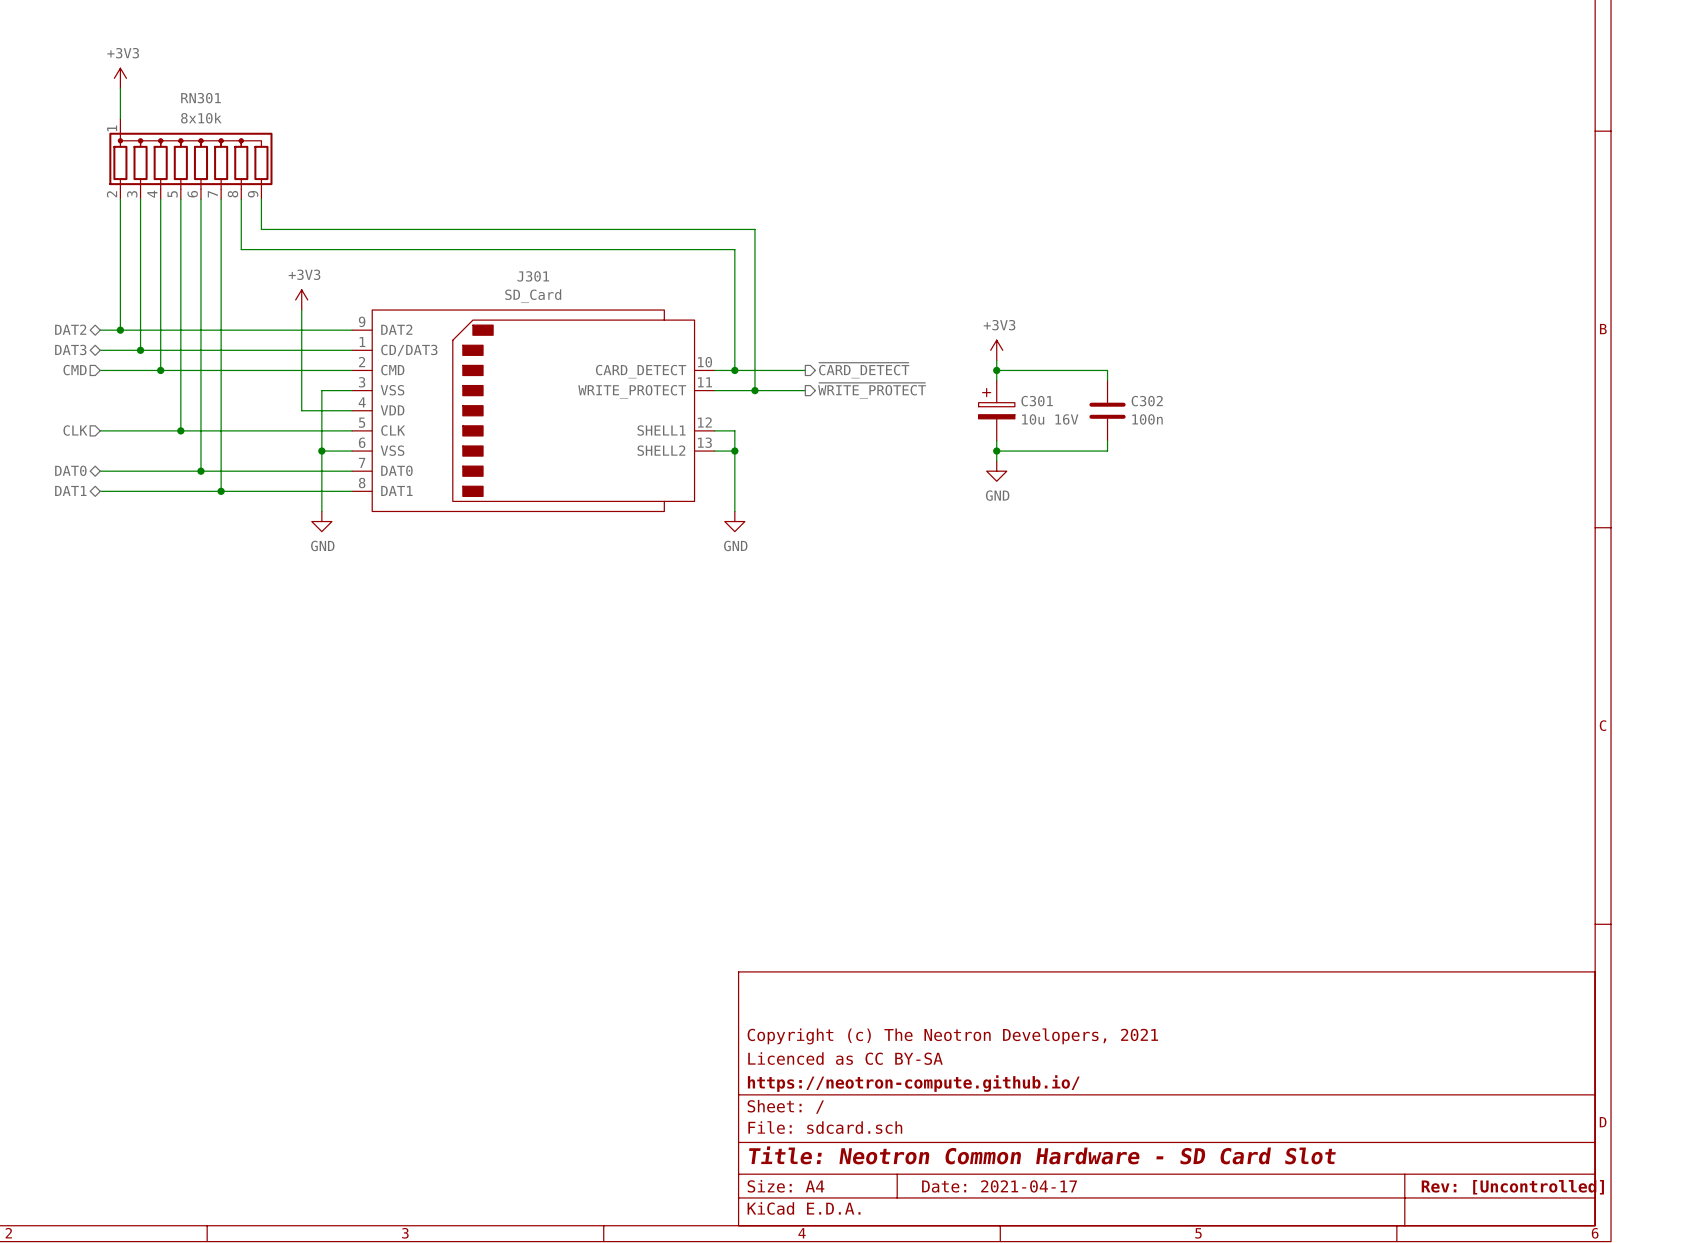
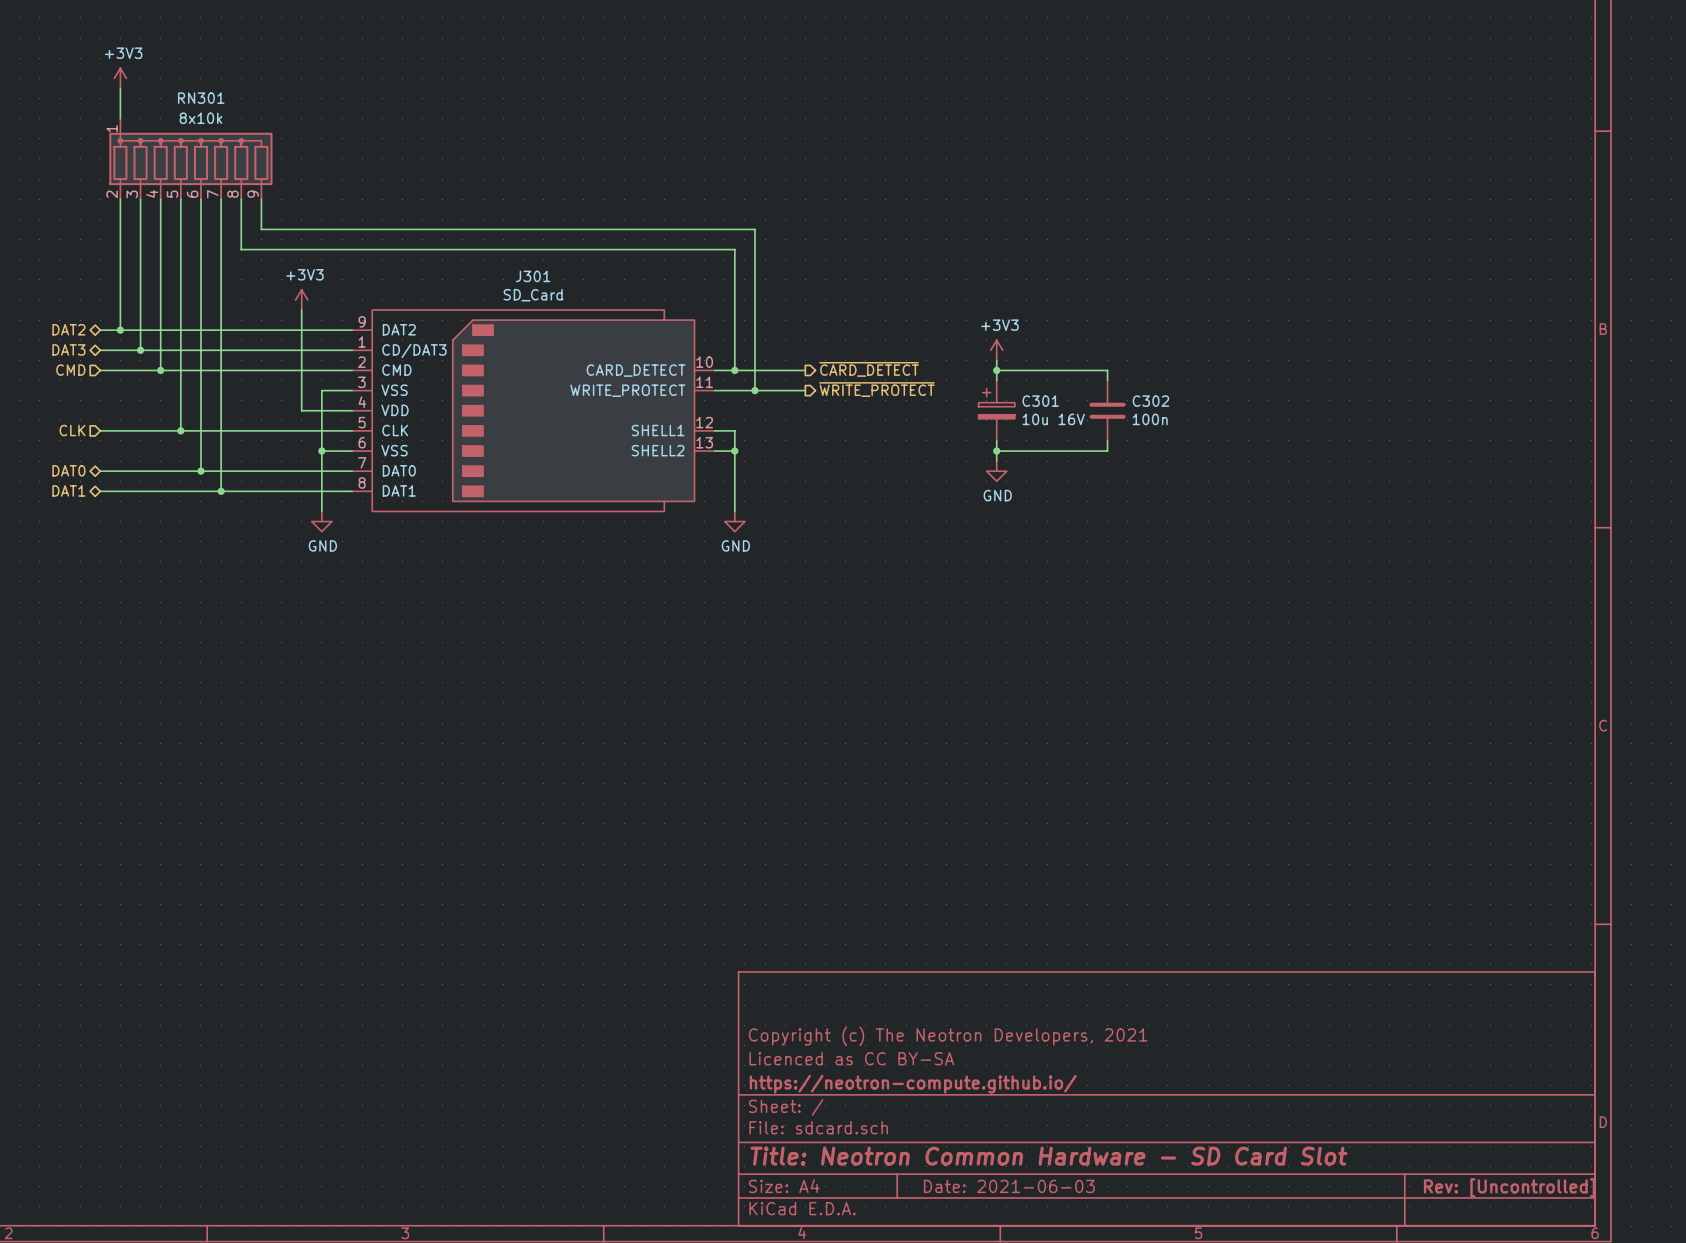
title block: Date: 2021-04-17 (999, 1186) -> Date: 2021-06-03 (1009, 1186)

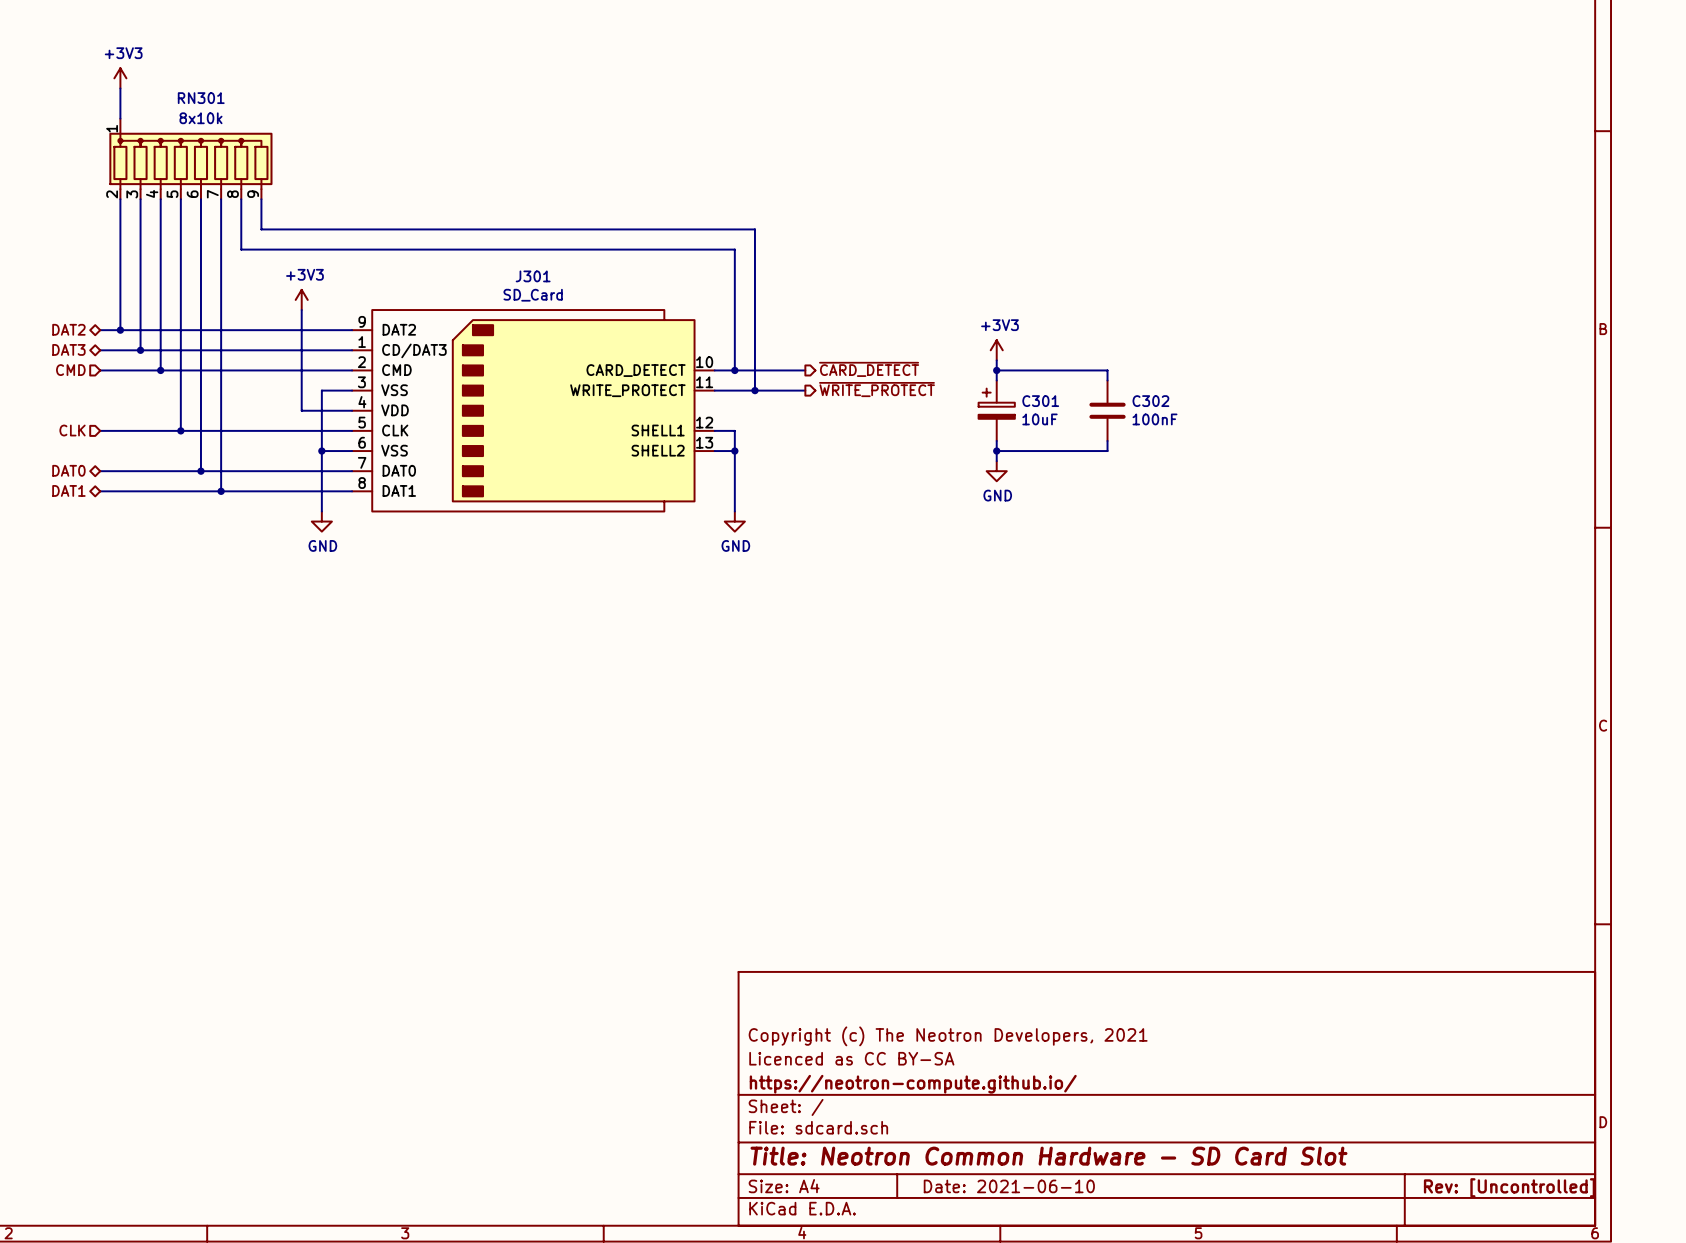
C301 value: 10u 16V (1053, 419) -> 10uF (1039, 419)
C302 value: 100n (1150, 419) -> 100nF (1154, 419)
title block: Date: 2021-06-03 (1009, 1186) -> Date: 2021-06-10 (1009, 1186)

